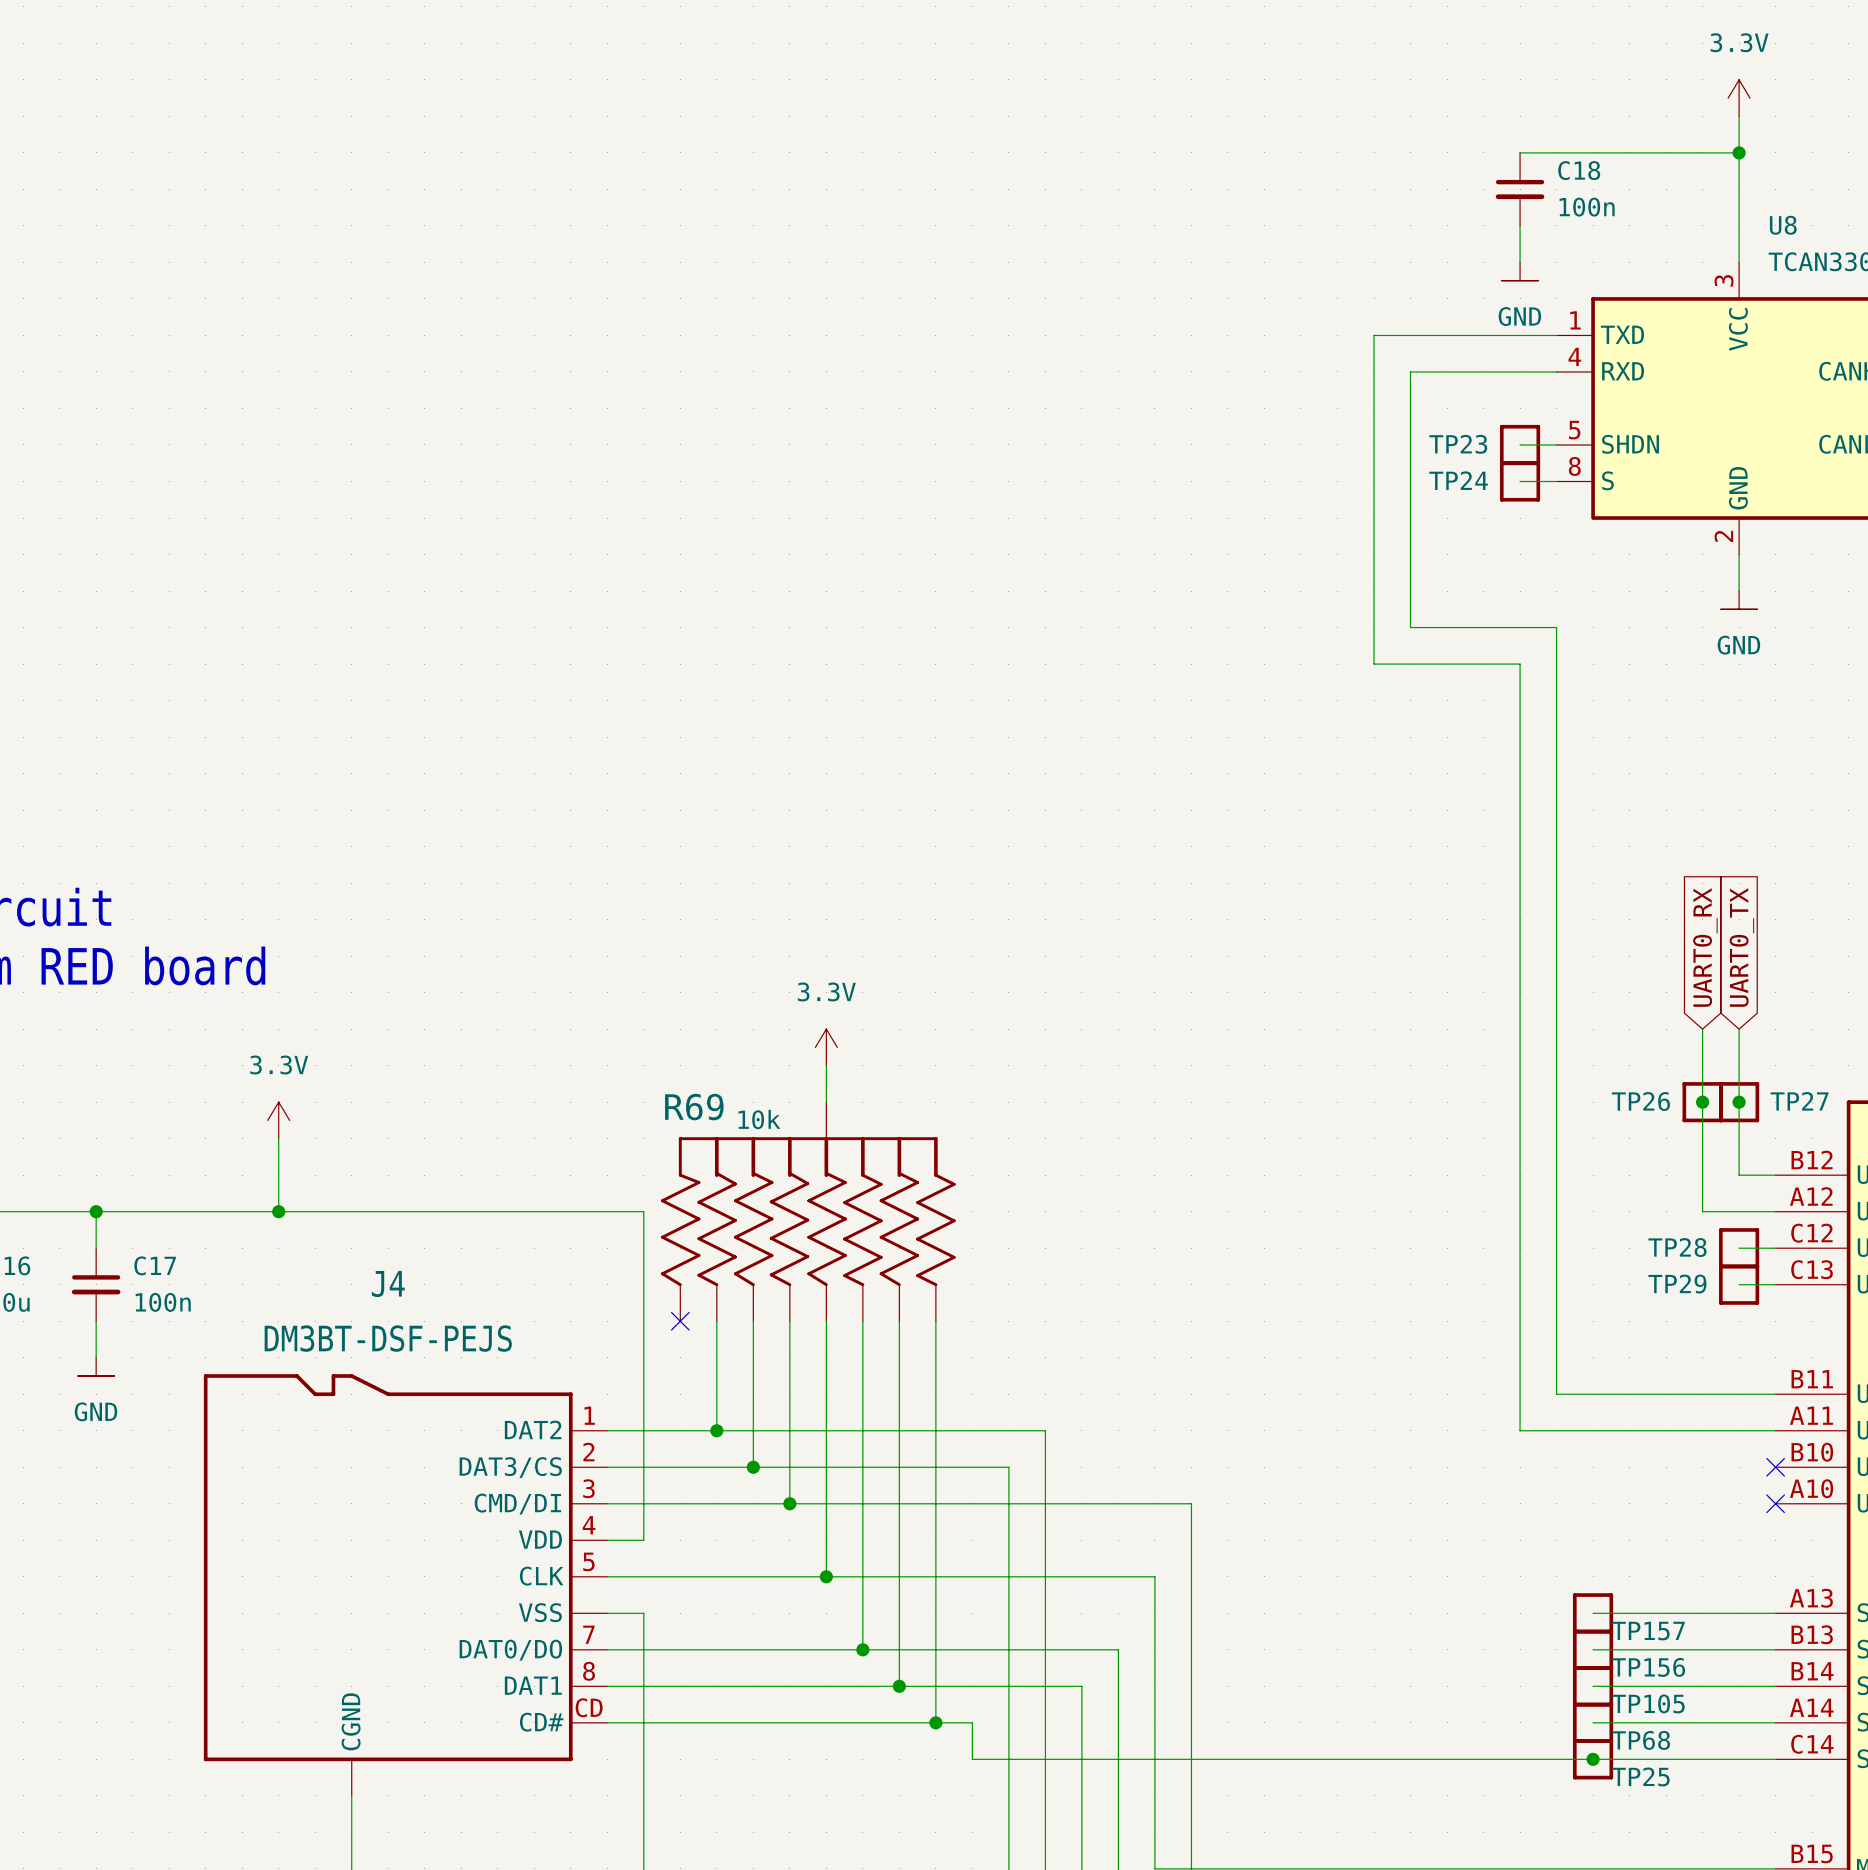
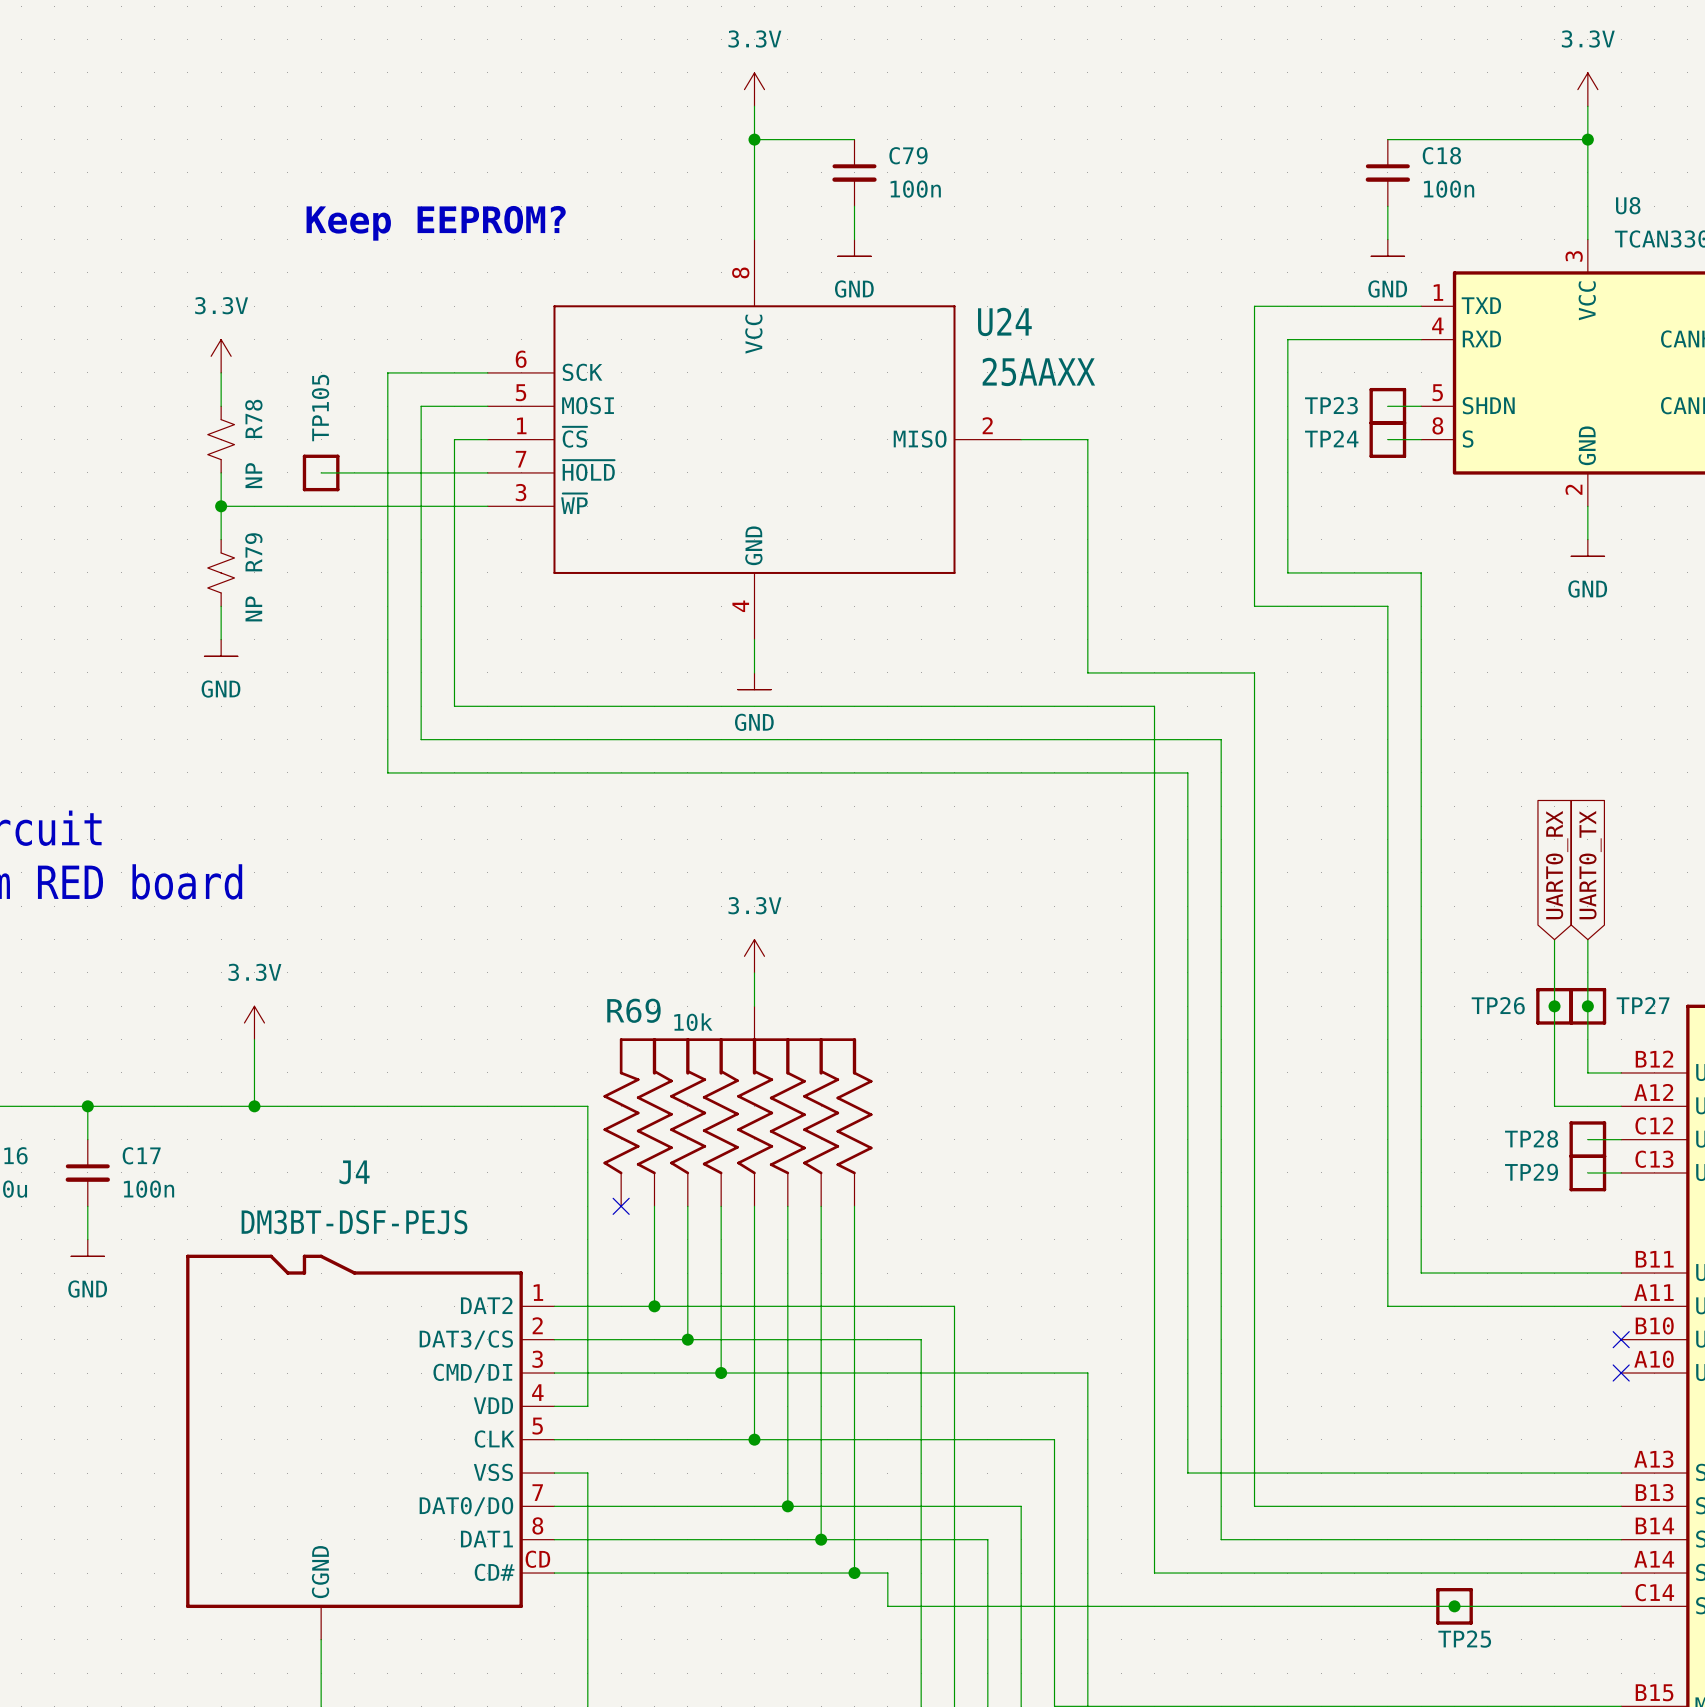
power symbol: none -> 3.3V (754, 89)
wire: none -> (754, 106) (754, 239)
wire: none -> (754, 139) (854, 139)
junction: none -> (754, 139)
C79: none -> 100n (854, 172)
wire: none -> (854, 206) (854, 239)
text: none -> Keep EEPROM? (436, 223)
power symbol: none -> GND (854, 247)
power symbol: none -> 3.3V (221, 356)
wire: none -> (221, 372) (221, 406)
wire: none -> (487, 372) (387, 372) (387, 772) (1187, 772) (1187, 1473) (1454, 1473)
wire: none -> (487, 406) (421, 406) (421, 739) (1221, 739) (1221, 1539) (1454, 1539)
R78: none -> NP (221, 439)
wire: none -> (487, 439) (454, 439) (454, 706) (1154, 706) (1154, 1573) (1454, 1573)
U24: none -> 25AAXX (754, 439)
wire: none -> (1021, 439) (1087, 439) (1087, 672) (1254, 672) (1254, 1506) (1454, 1506)
wire: none -> (221, 472) (221, 539)
wire: none -> (321, 472) (487, 472)
wire: none -> (221, 506) (487, 506)
junction: none -> (221, 506)
R79: none -> NP (221, 572)
wire: none -> (221, 606) (221, 639)
wire: none -> (754, 639) (754, 672)
power symbol: none -> GND (221, 647)
power symbol: none -> GND (754, 681)
TP157: (1593, 1613) -> none
TP156: (1593, 1649) -> none
TP105 position: (1593, 1686) -> (321, 472)
TP105 name rotation: 0° (1648, 1703) -> 90° counterclockwise (320, 408)
TP105 name position: TP105 (1648, 1703) -> TP105 (320, 408)
TP68: (1593, 1722) -> none
TP25 name position: TP25 (1640, 1776) -> TP25 (1464, 1639)

